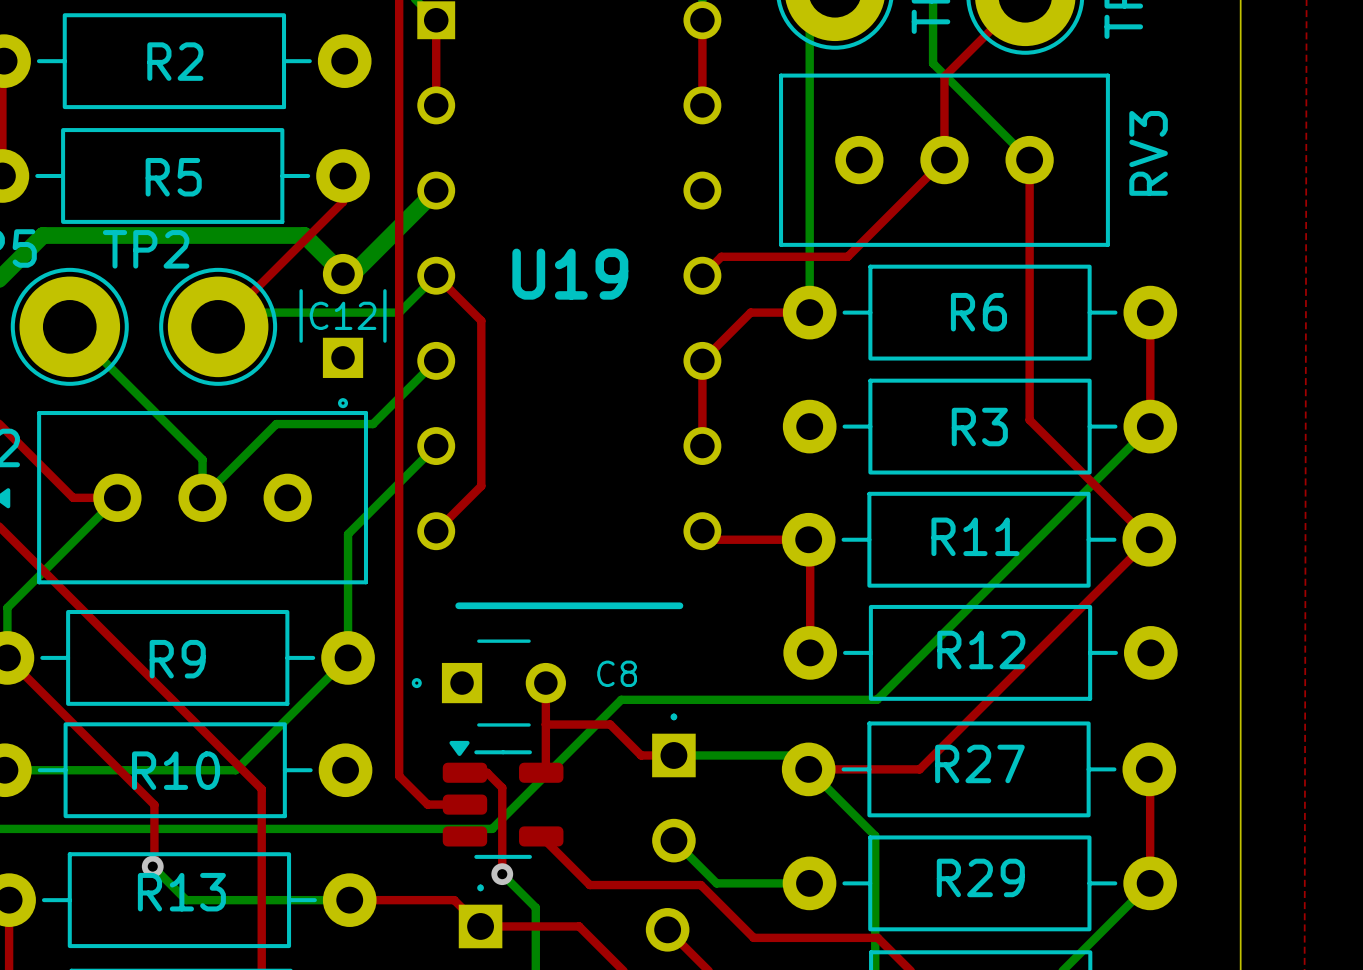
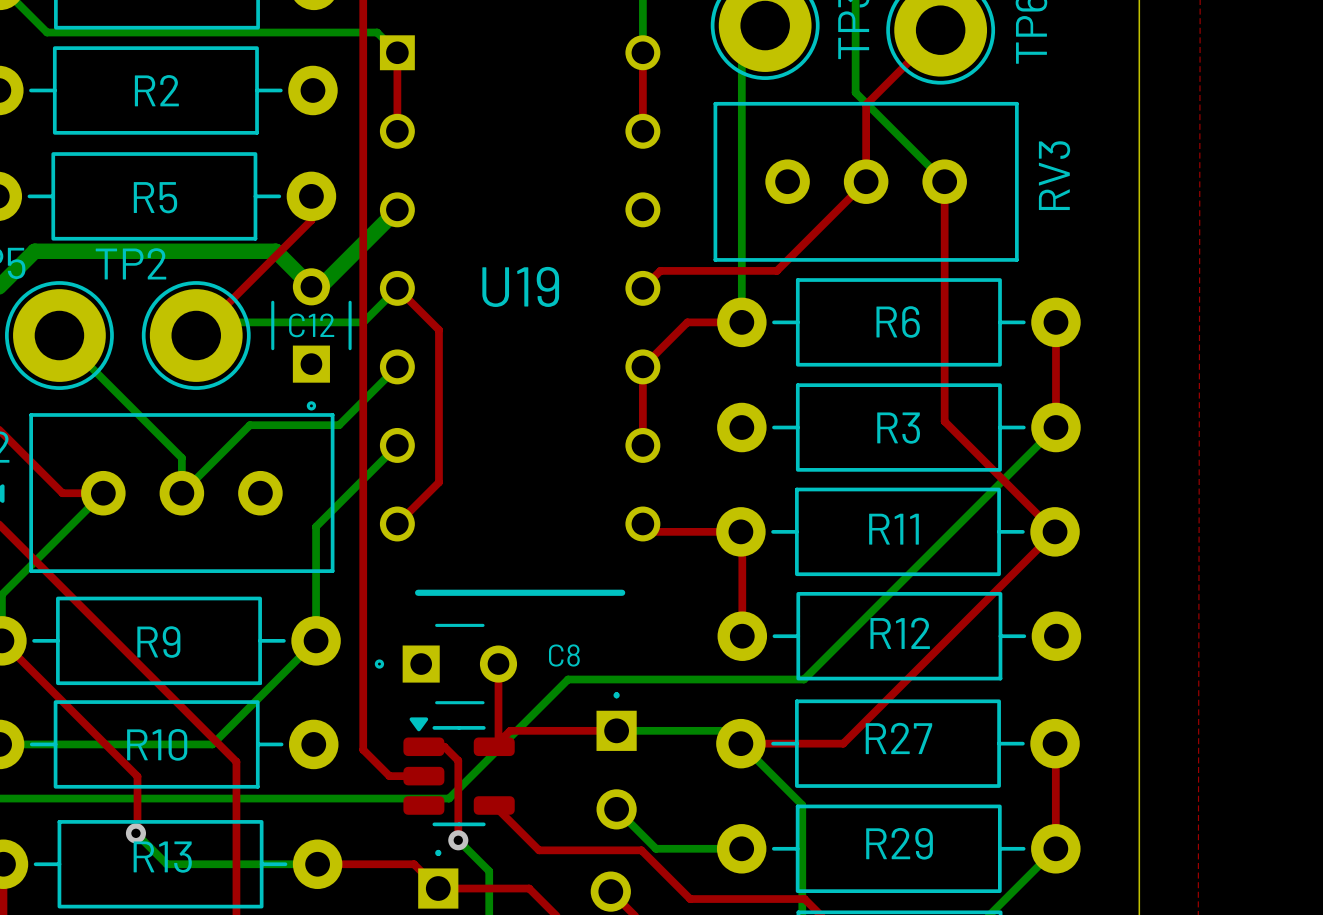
top track: (545, 724) (610, 724) (641, 755) -> (494, 746) (510, 730) (586, 730)

